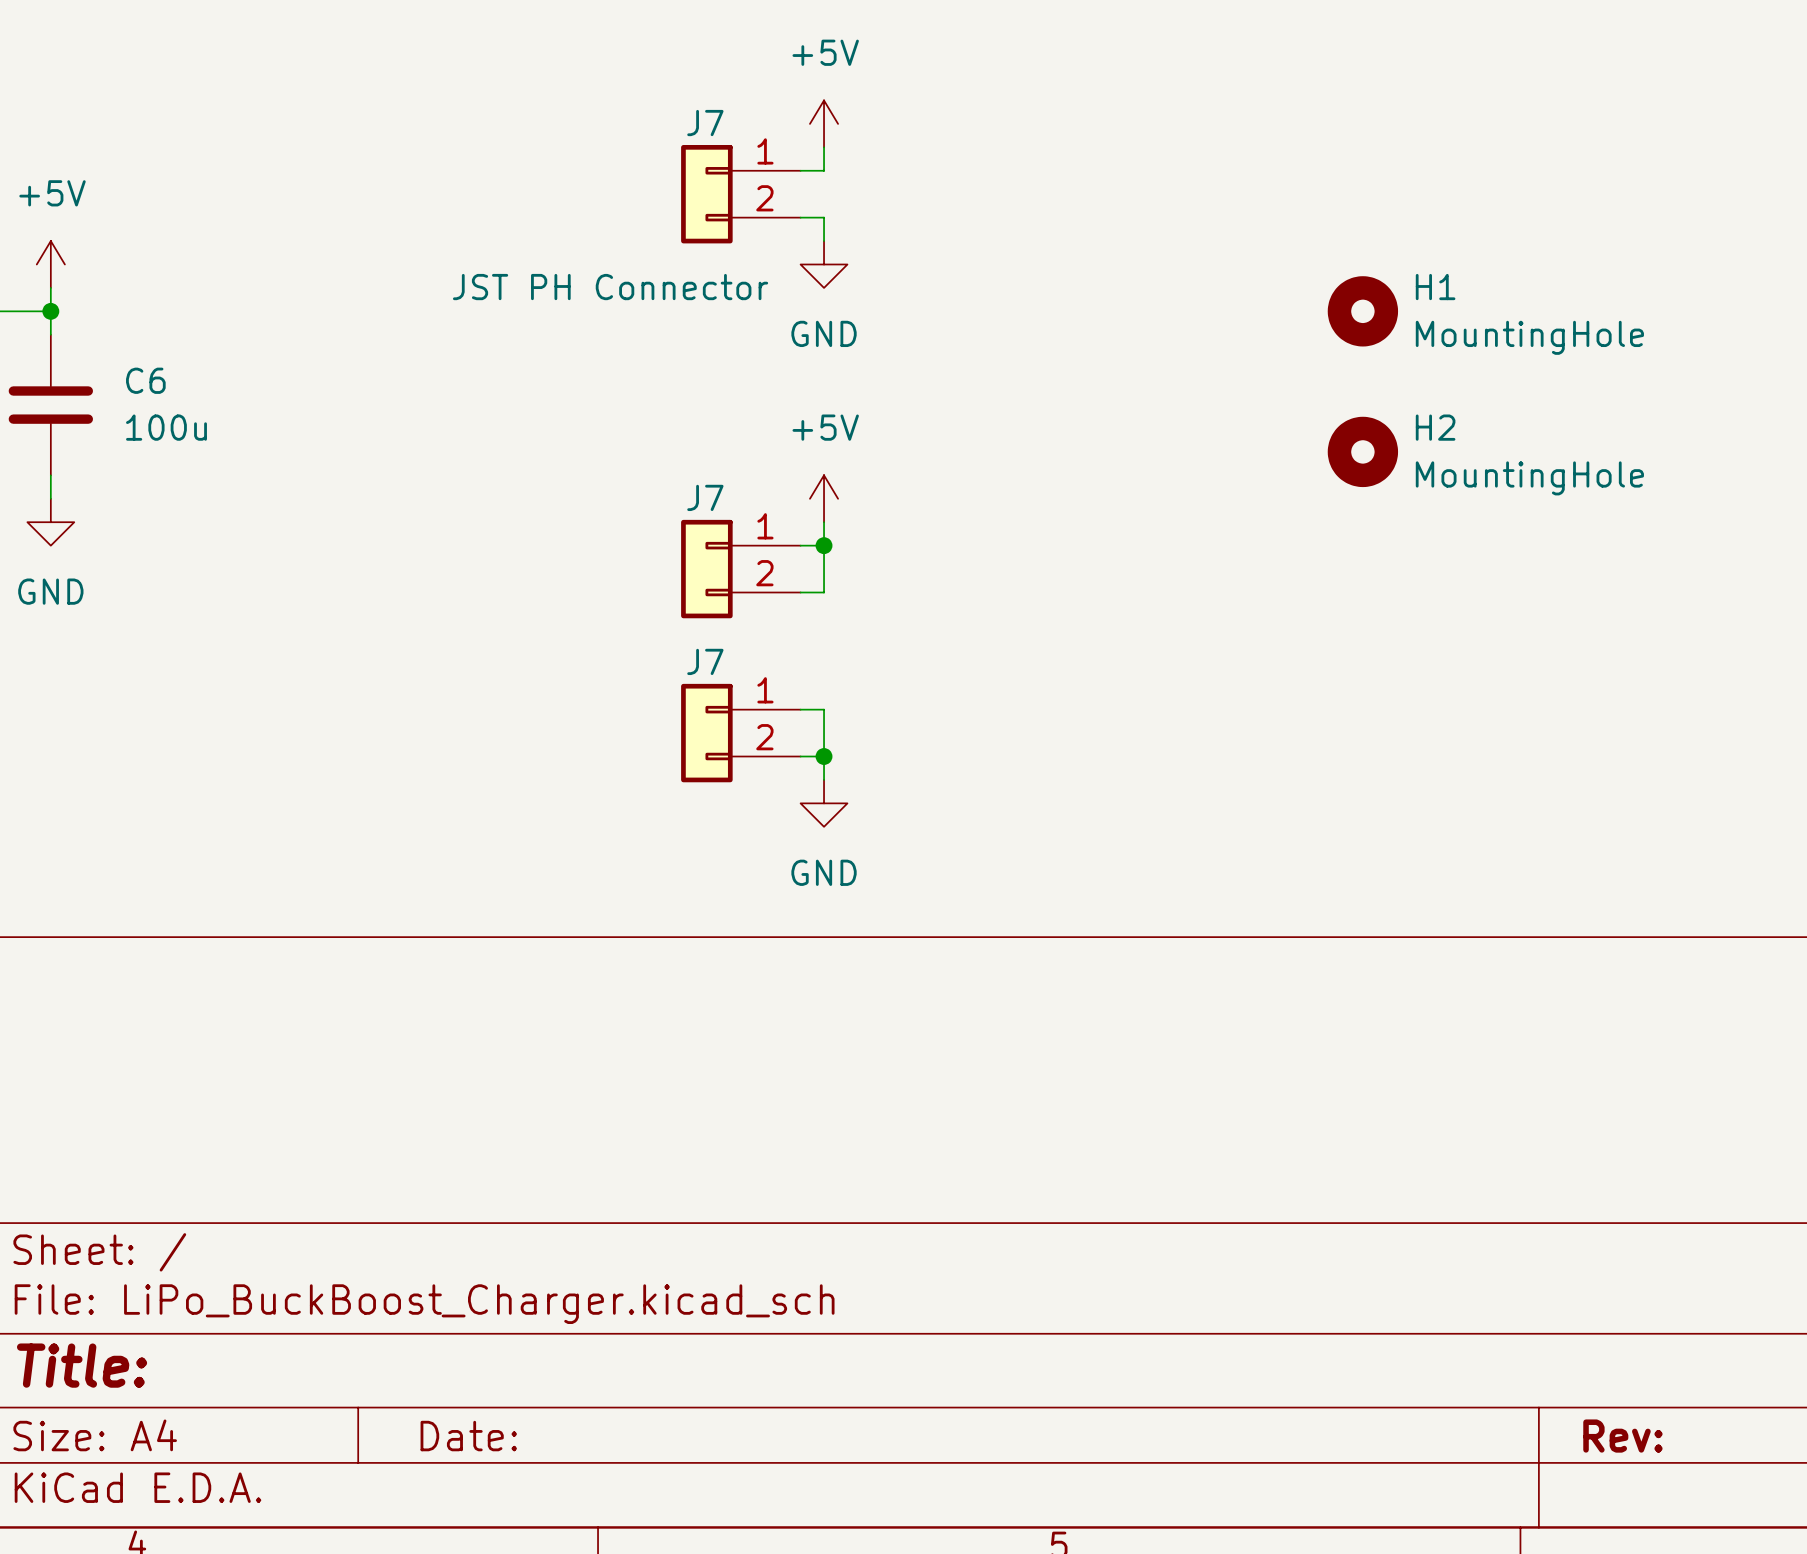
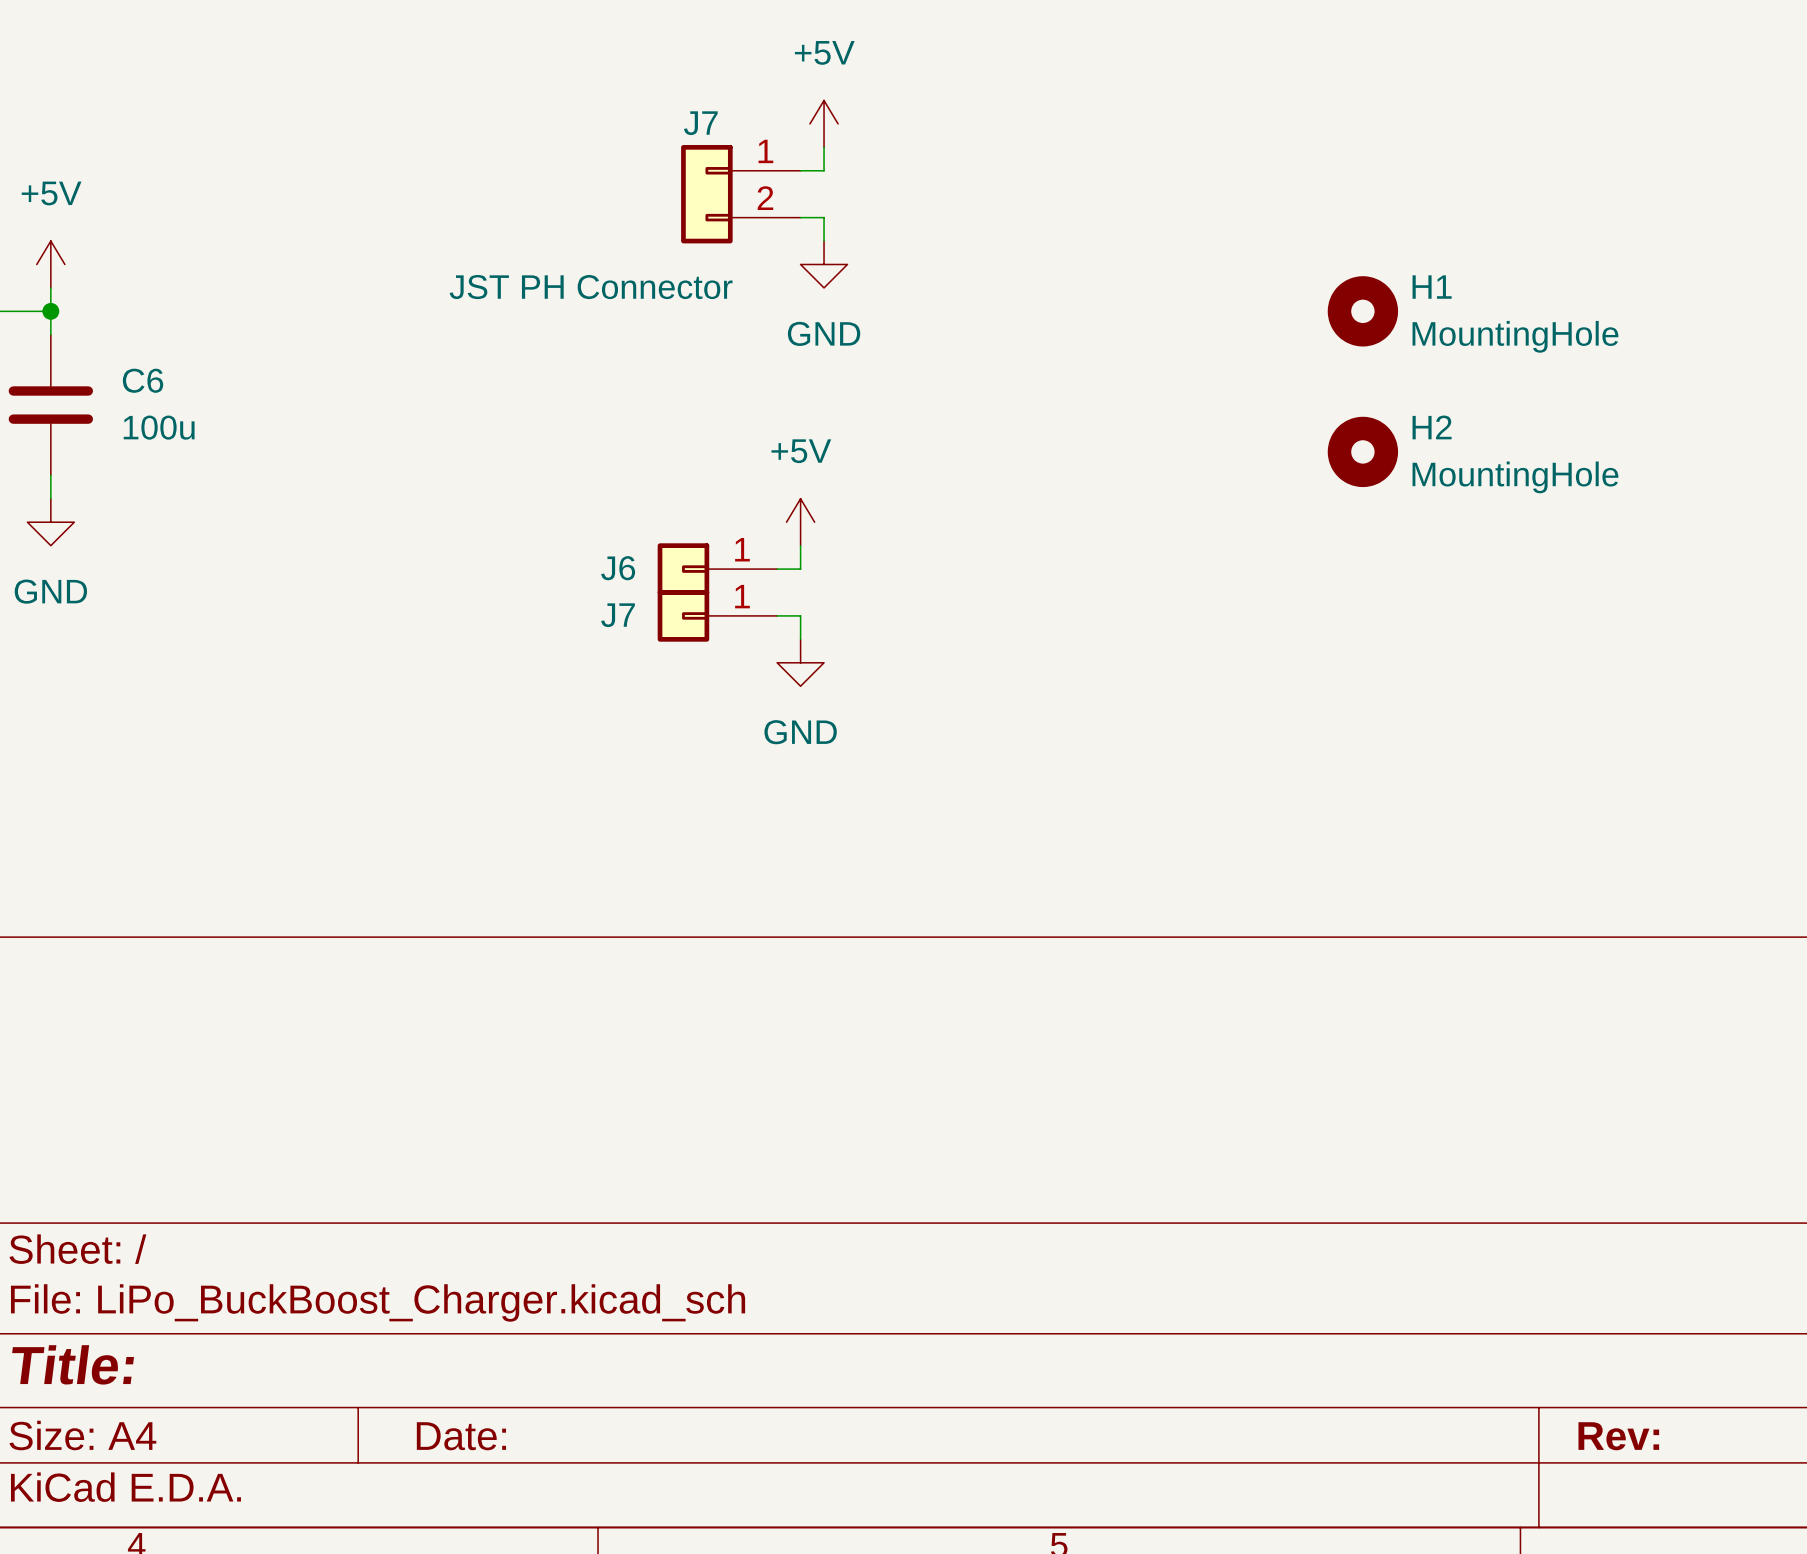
power symbol position: +5V (824, 498) -> +5V (800, 522)
wire: (824, 522) (824, 592) (800, 592) -> none
wire: (800, 545) (824, 545) -> (800, 545) (800, 569) (777, 569)
junction: (824, 545) -> none
J6: none -> (717, 569)
J7: (740, 569) -> none
J7: none -> (717, 615)
wire: none -> (777, 615) (800, 615) (800, 639)
wire: (800, 709) (824, 709) (824, 779) -> none
J7: (740, 733) -> none
wire: (800, 756) (824, 756) -> none
junction: (824, 756) -> none
power symbol position: GND (824, 803) -> GND (800, 662)

